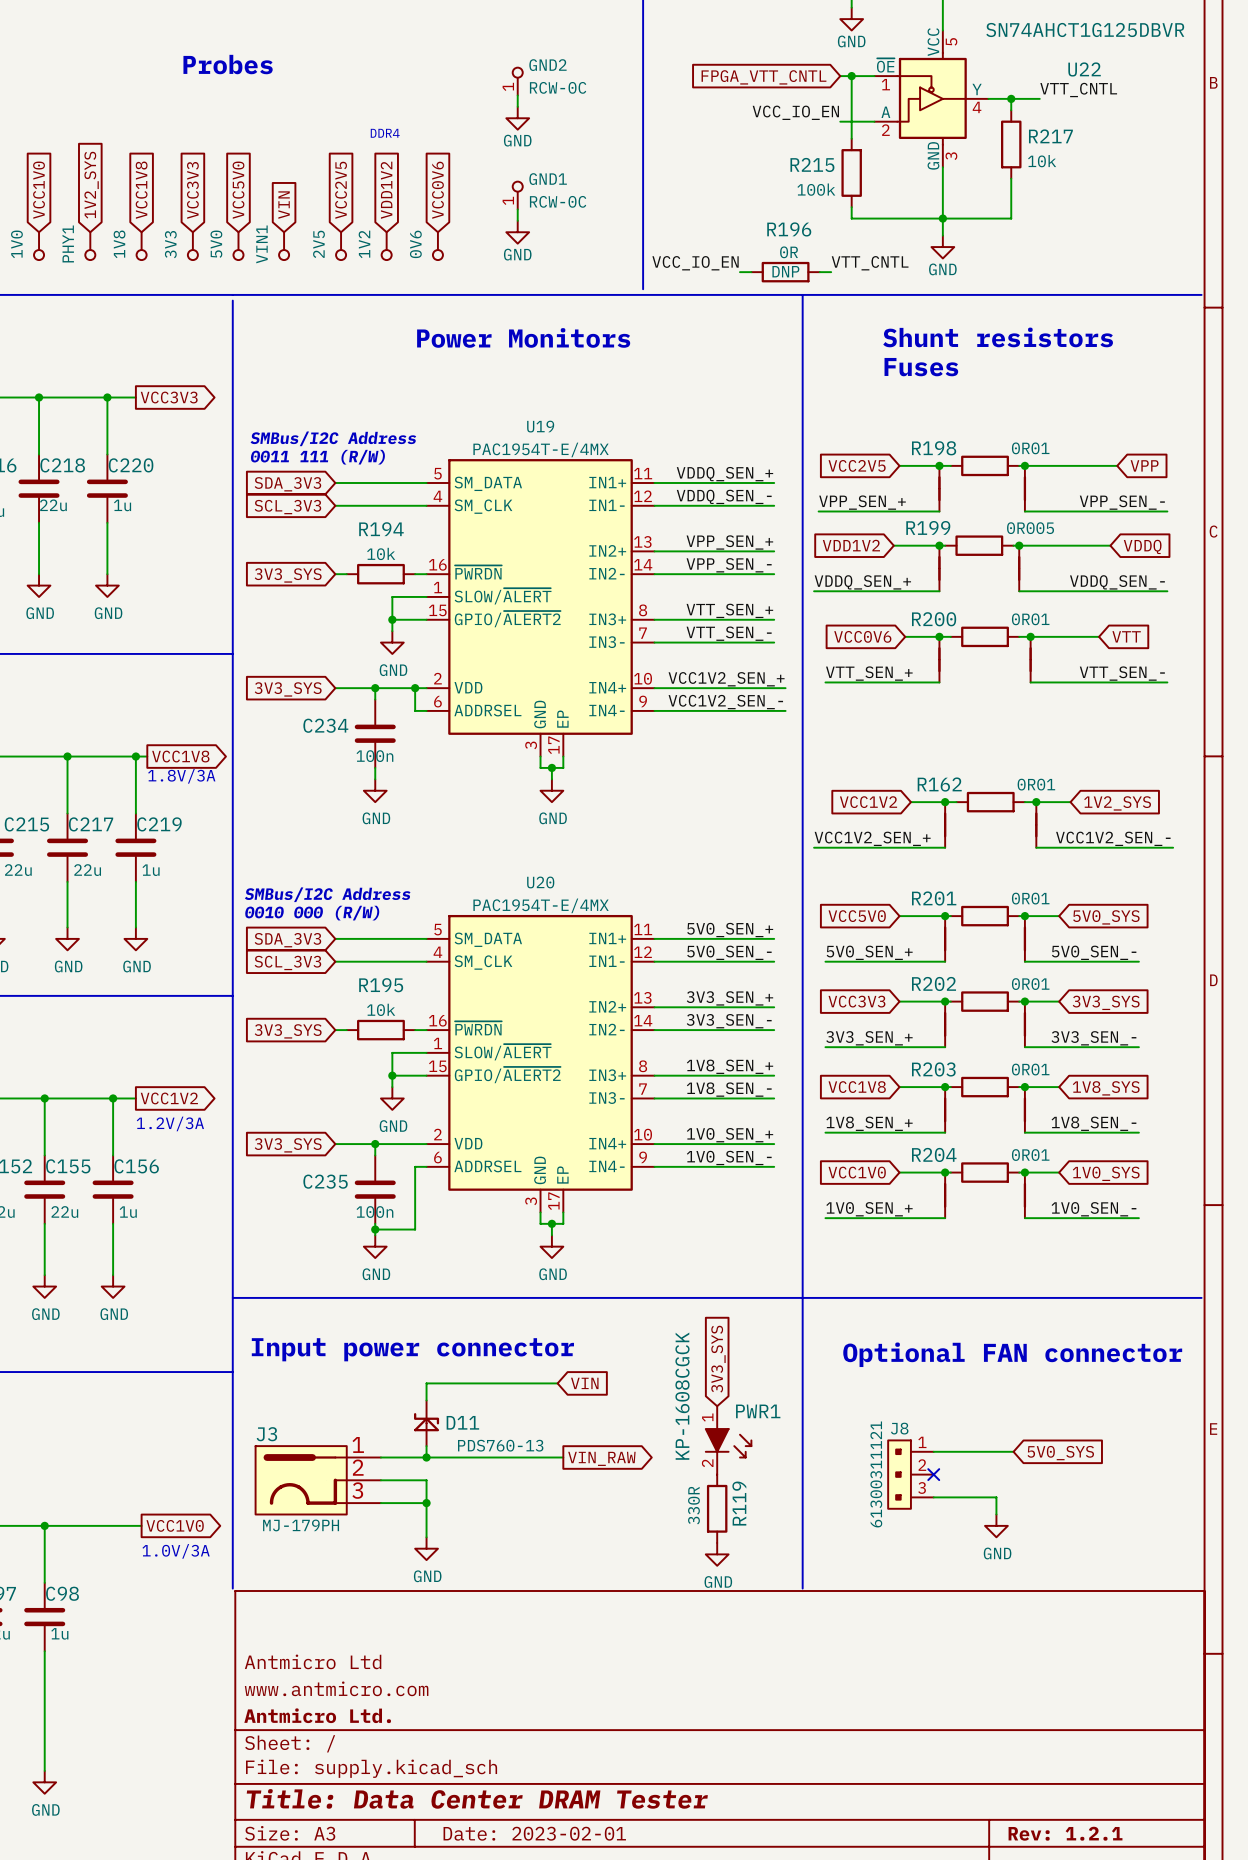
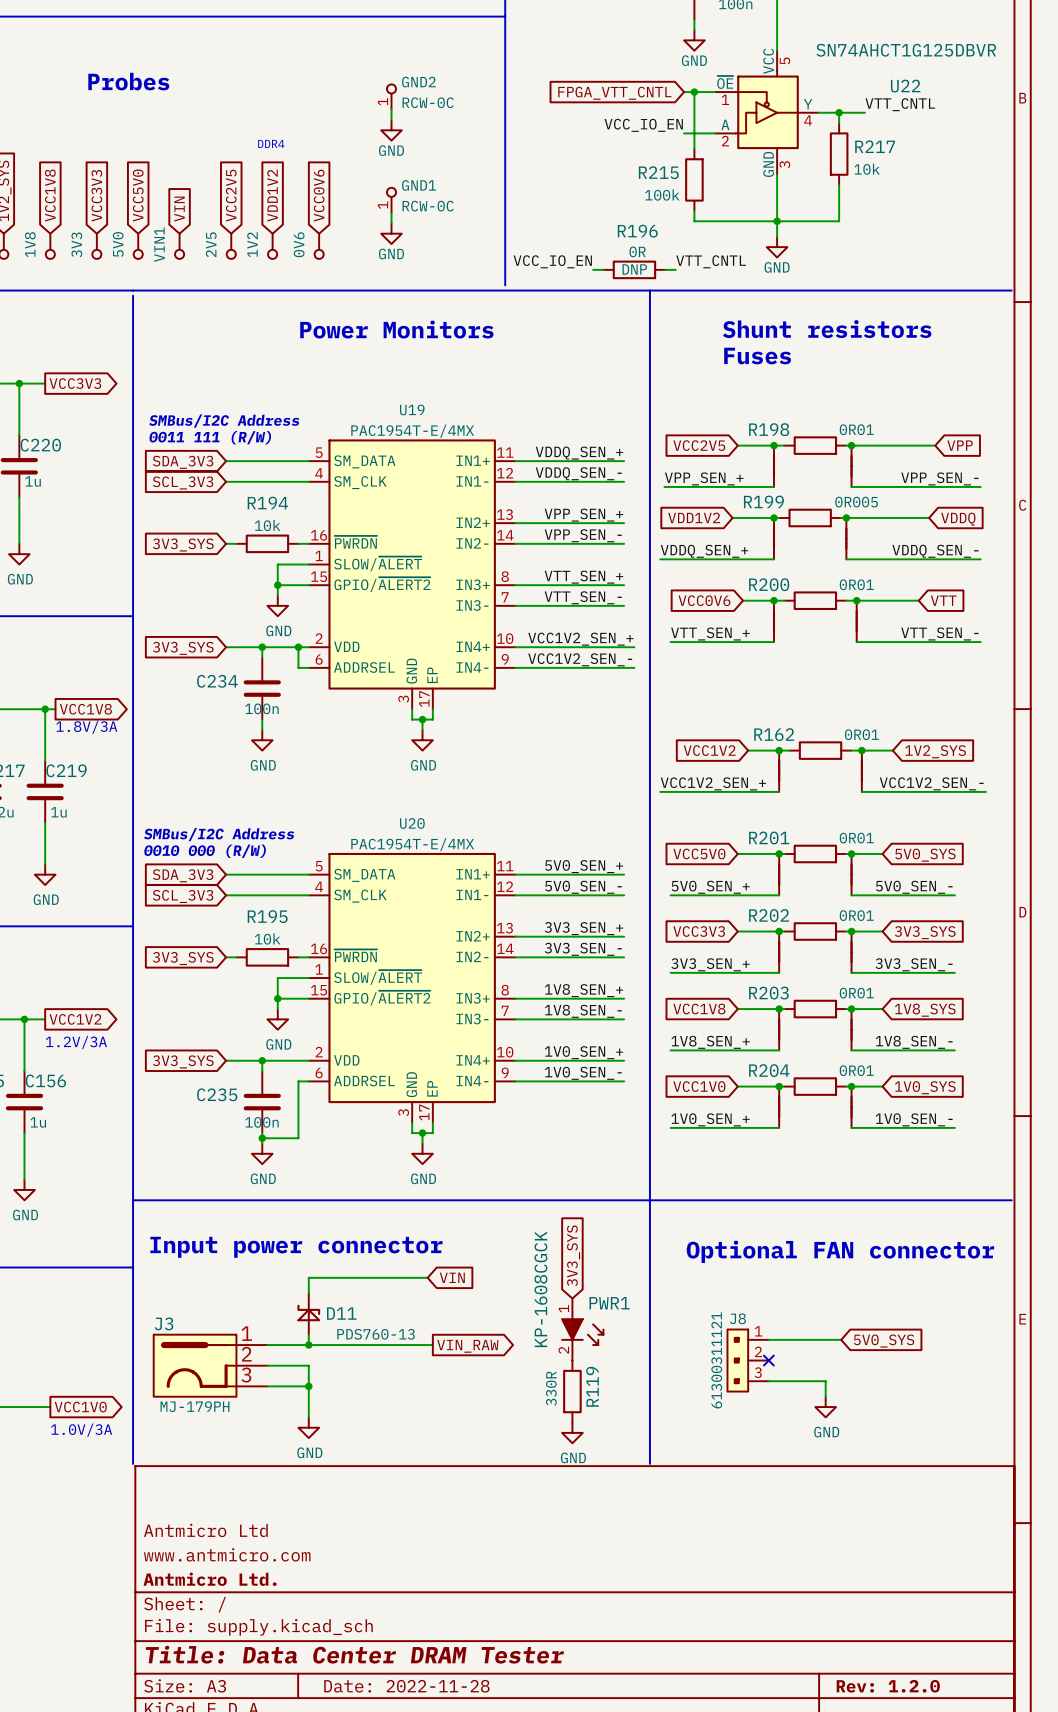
title block: Date: 2023-02-01 (534, 1833) -> Date: 2022-11-28 (406, 1686)
title block: Rev: 1.2.1 (1065, 1833) -> Rev: 1.2.0 (888, 1686)

